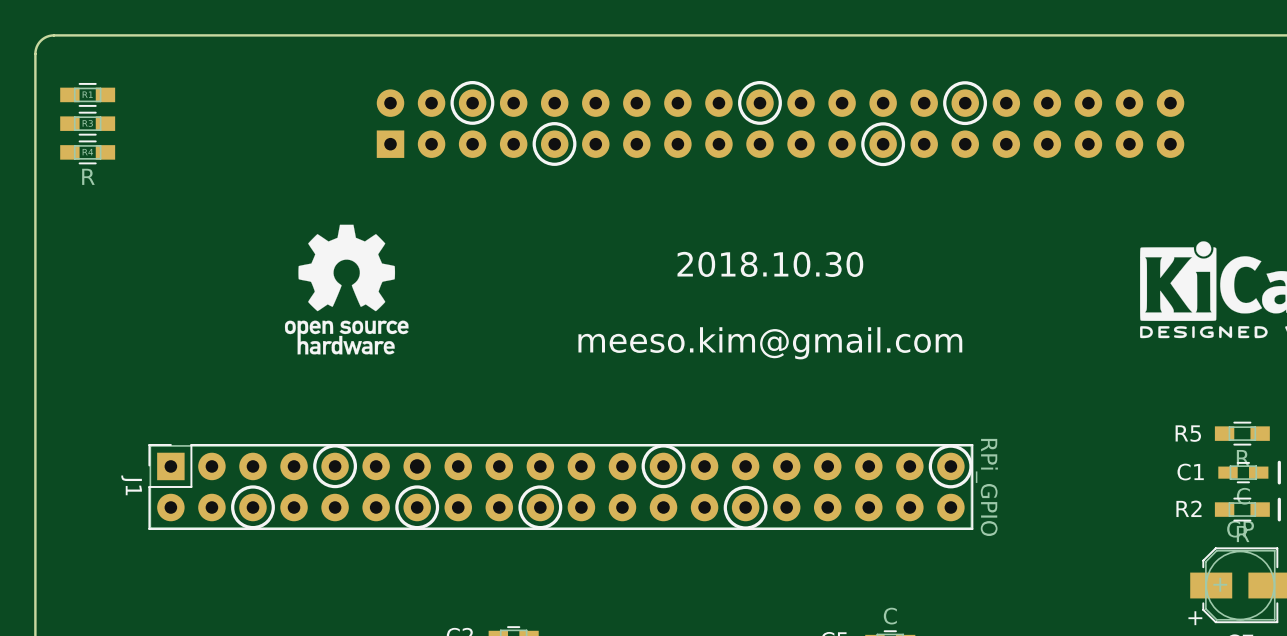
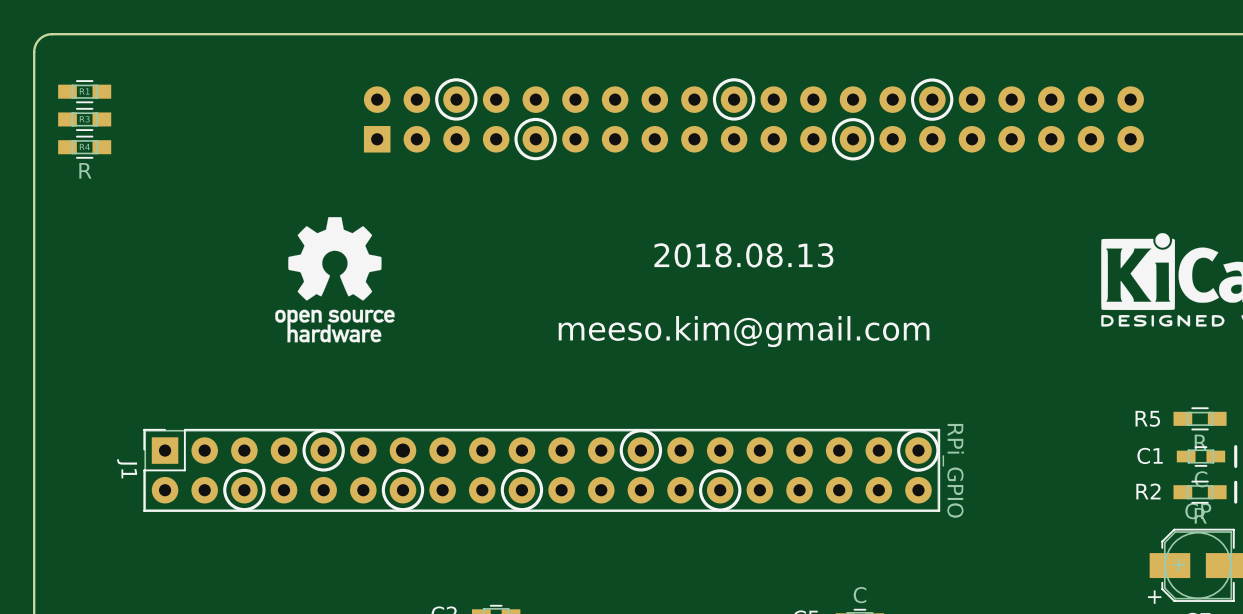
text: 2018.10.30 (770, 264) -> 2018.08.13 (743, 255)

